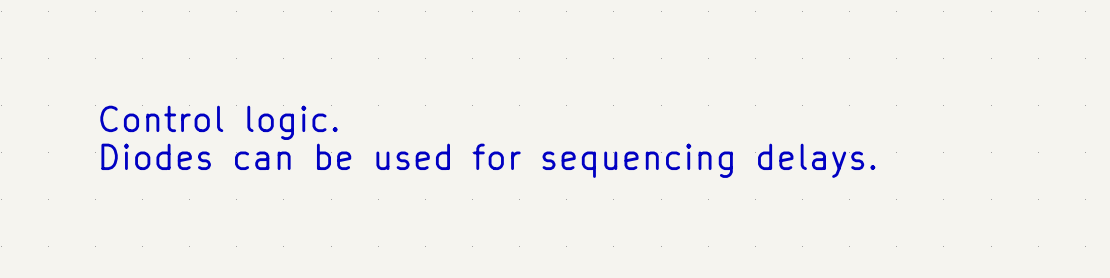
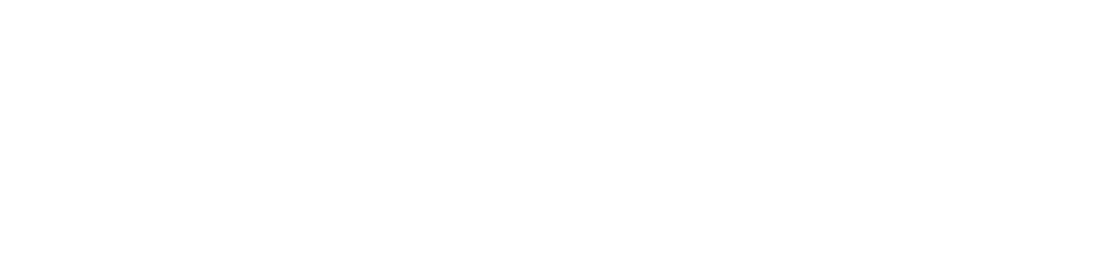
text: Control logic. (219, 122) -> none
text: Diodes can be used for sequencing delays. (488, 160) -> none

